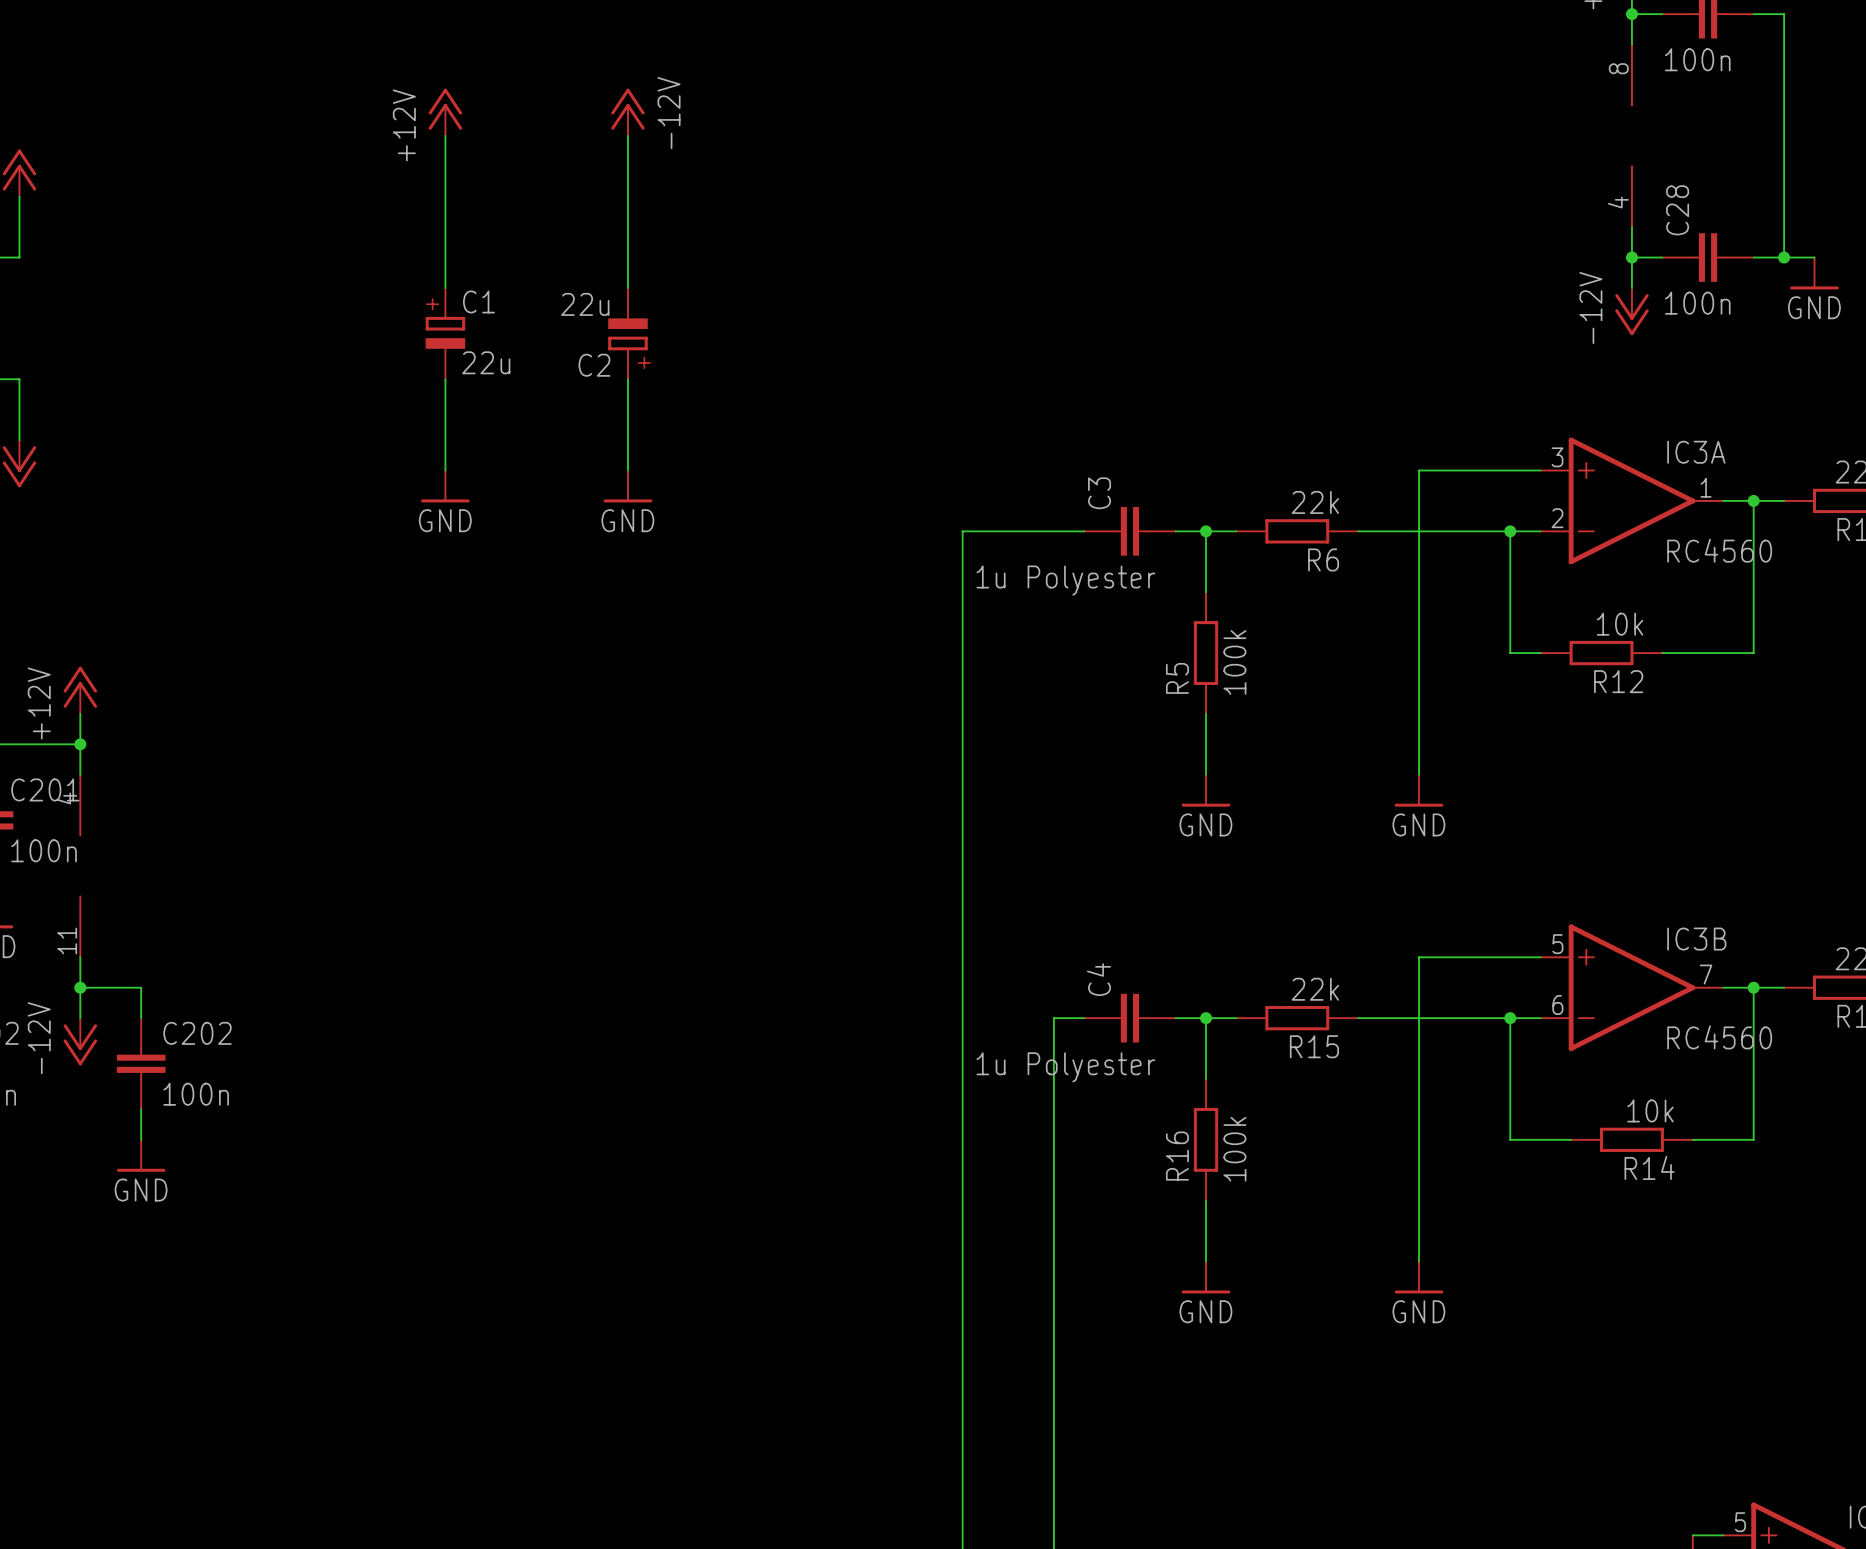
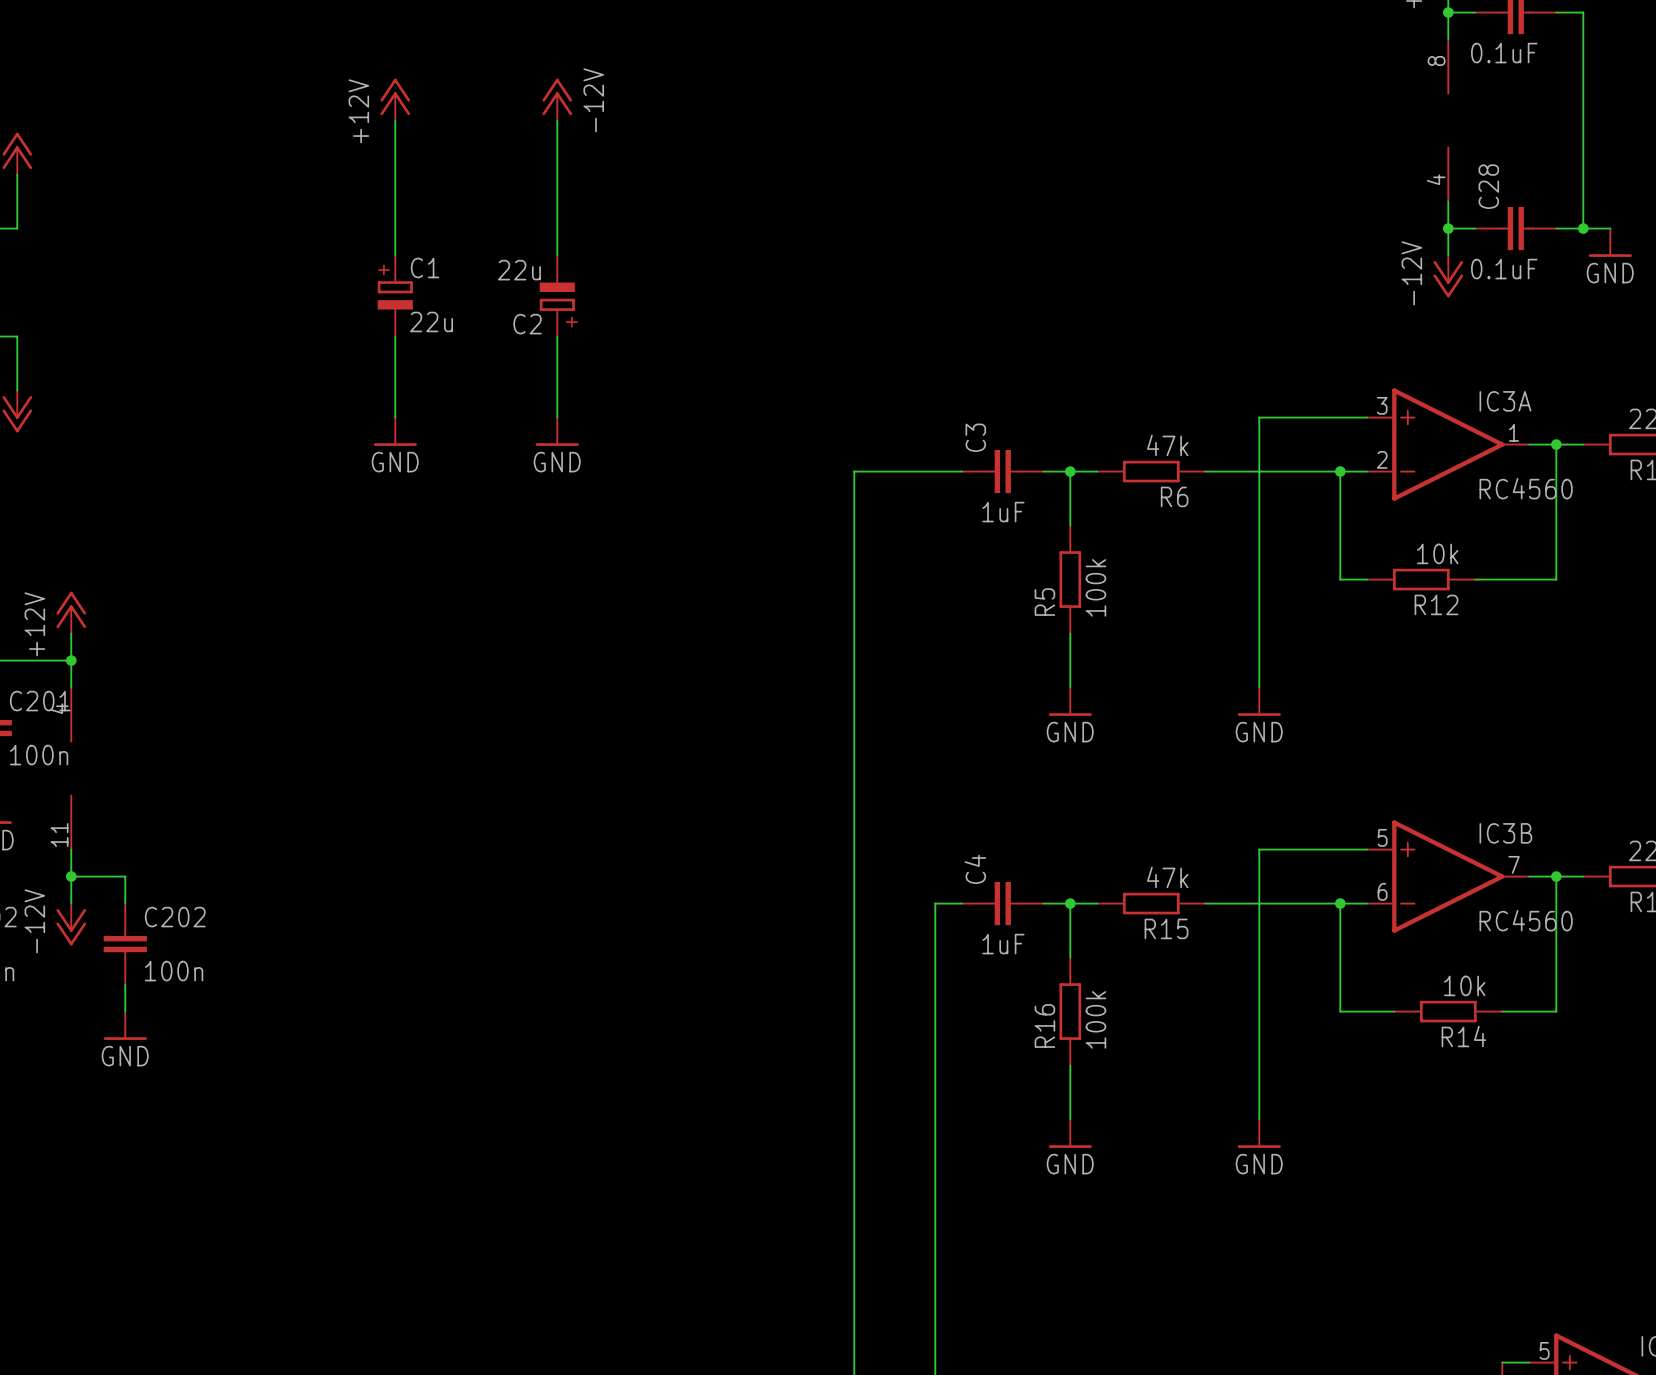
part value: 100n (1697, 59) -> 0.1uF (1504, 53)
C28 value: 100n (1697, 303) -> 0.1uF (1504, 269)
R6 value: 22k (1315, 502) -> 47k (1167, 445)
C3 value: 1u Polyester (1065, 580) -> 1uF (1003, 512)
R15 value: 22k (1315, 989) -> 47k (1167, 877)
C4 value: 1u Polyester (1065, 1067) -> 1uF (1003, 944)

